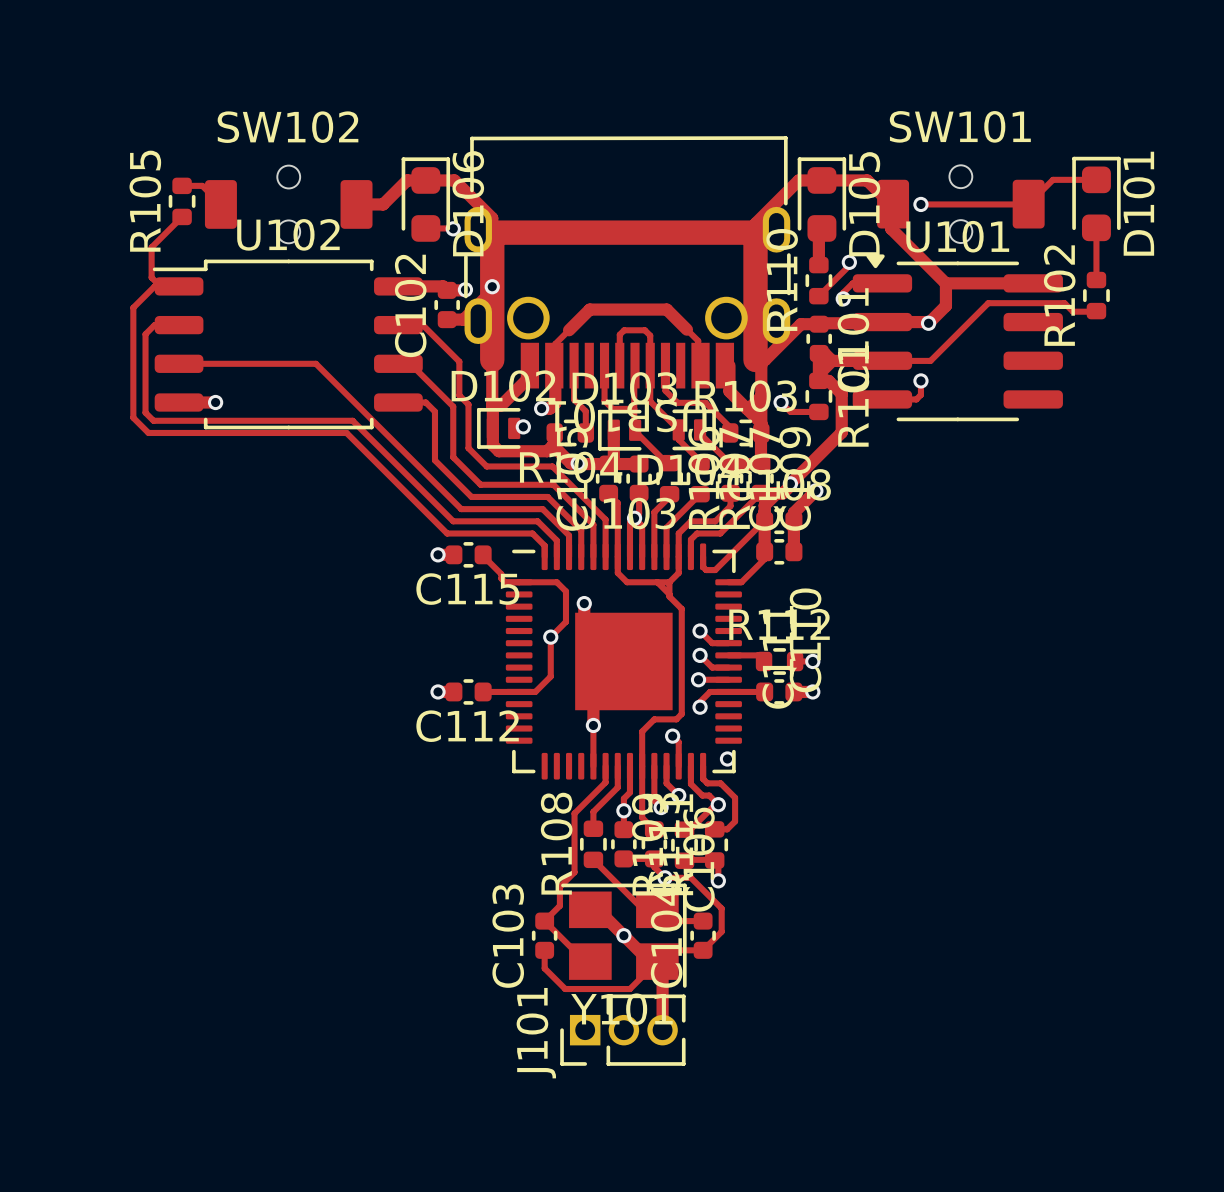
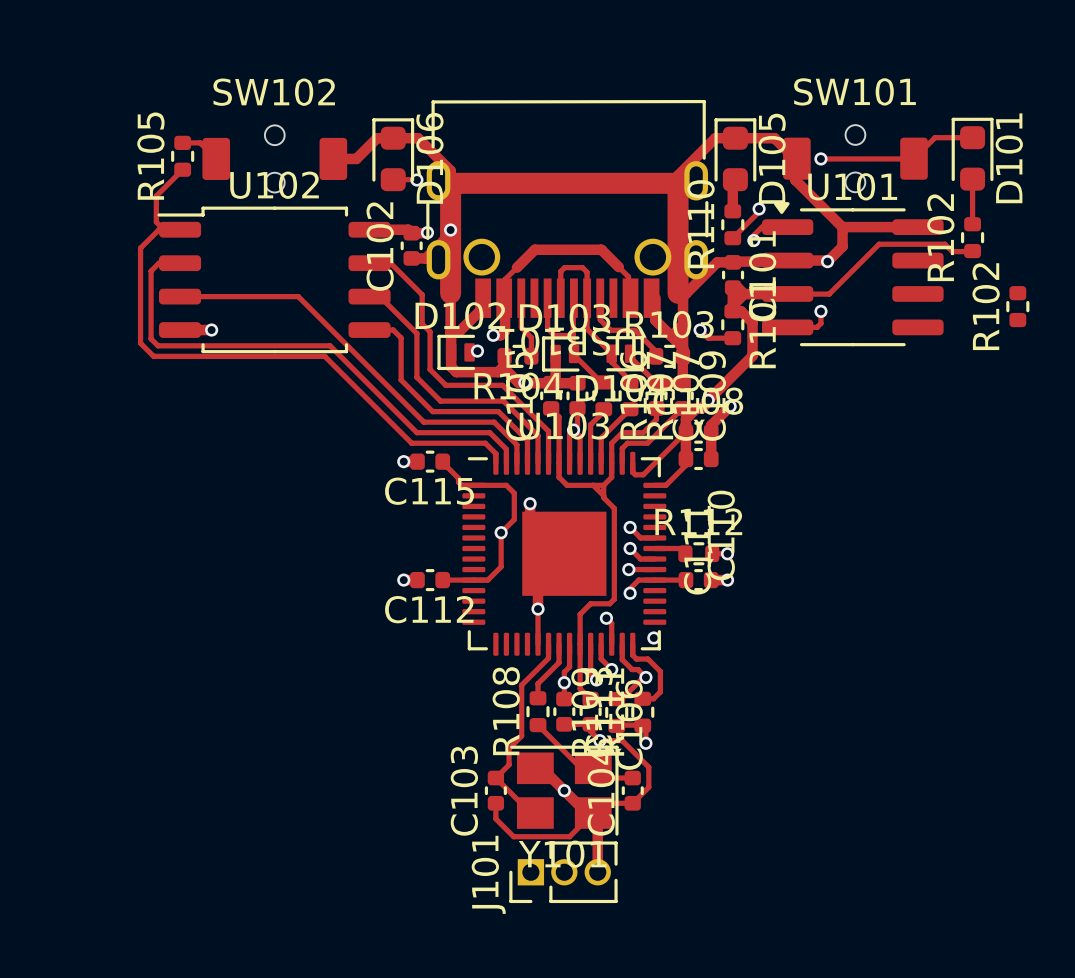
R102: none -> (1017, 306)

